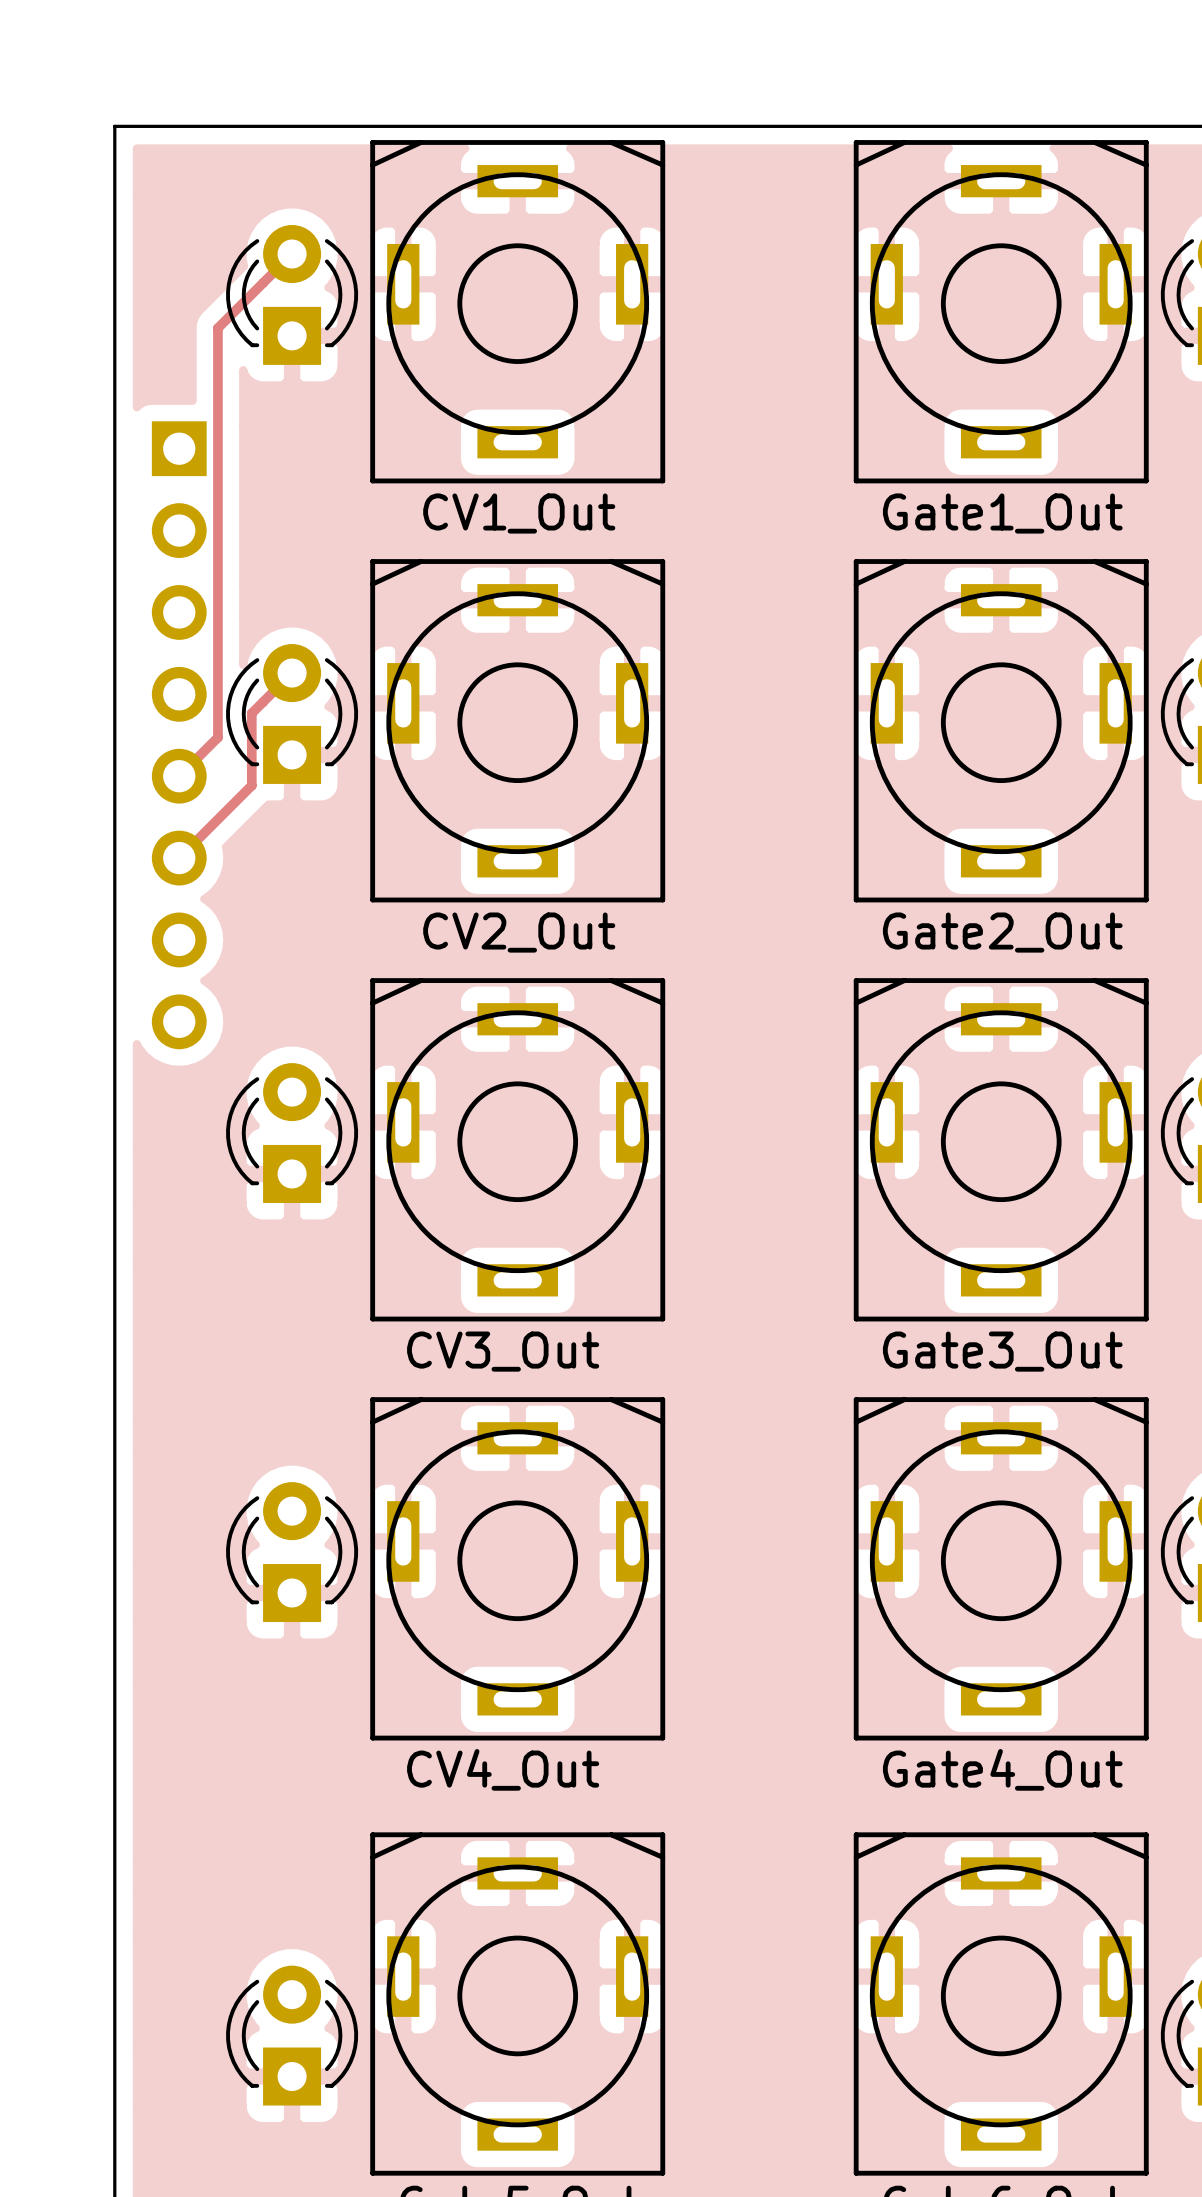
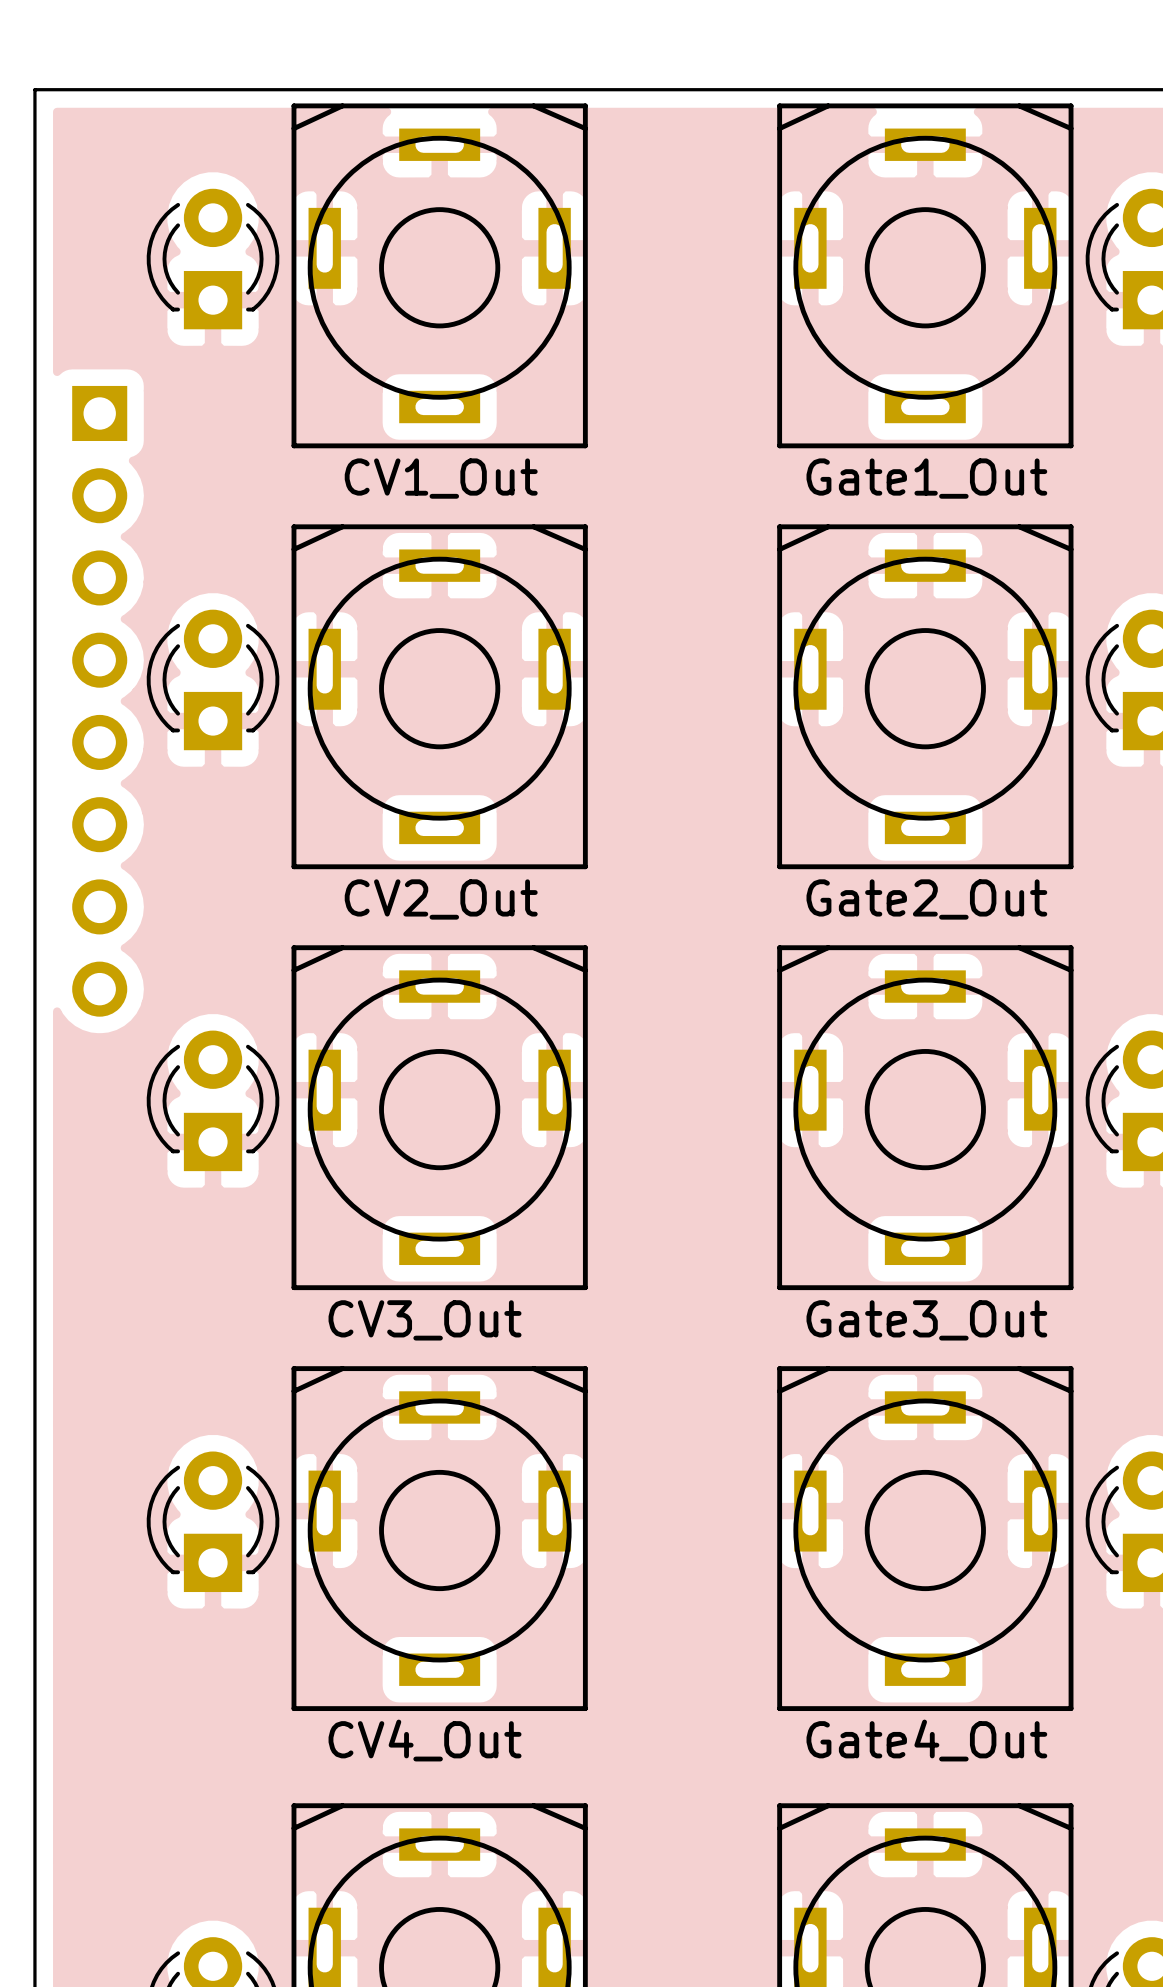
track: (292, 254) (217, 328) (217, 737) (179, 776) -> none
track: (292, 673) (251, 713) (251, 785) (179, 858) -> none

